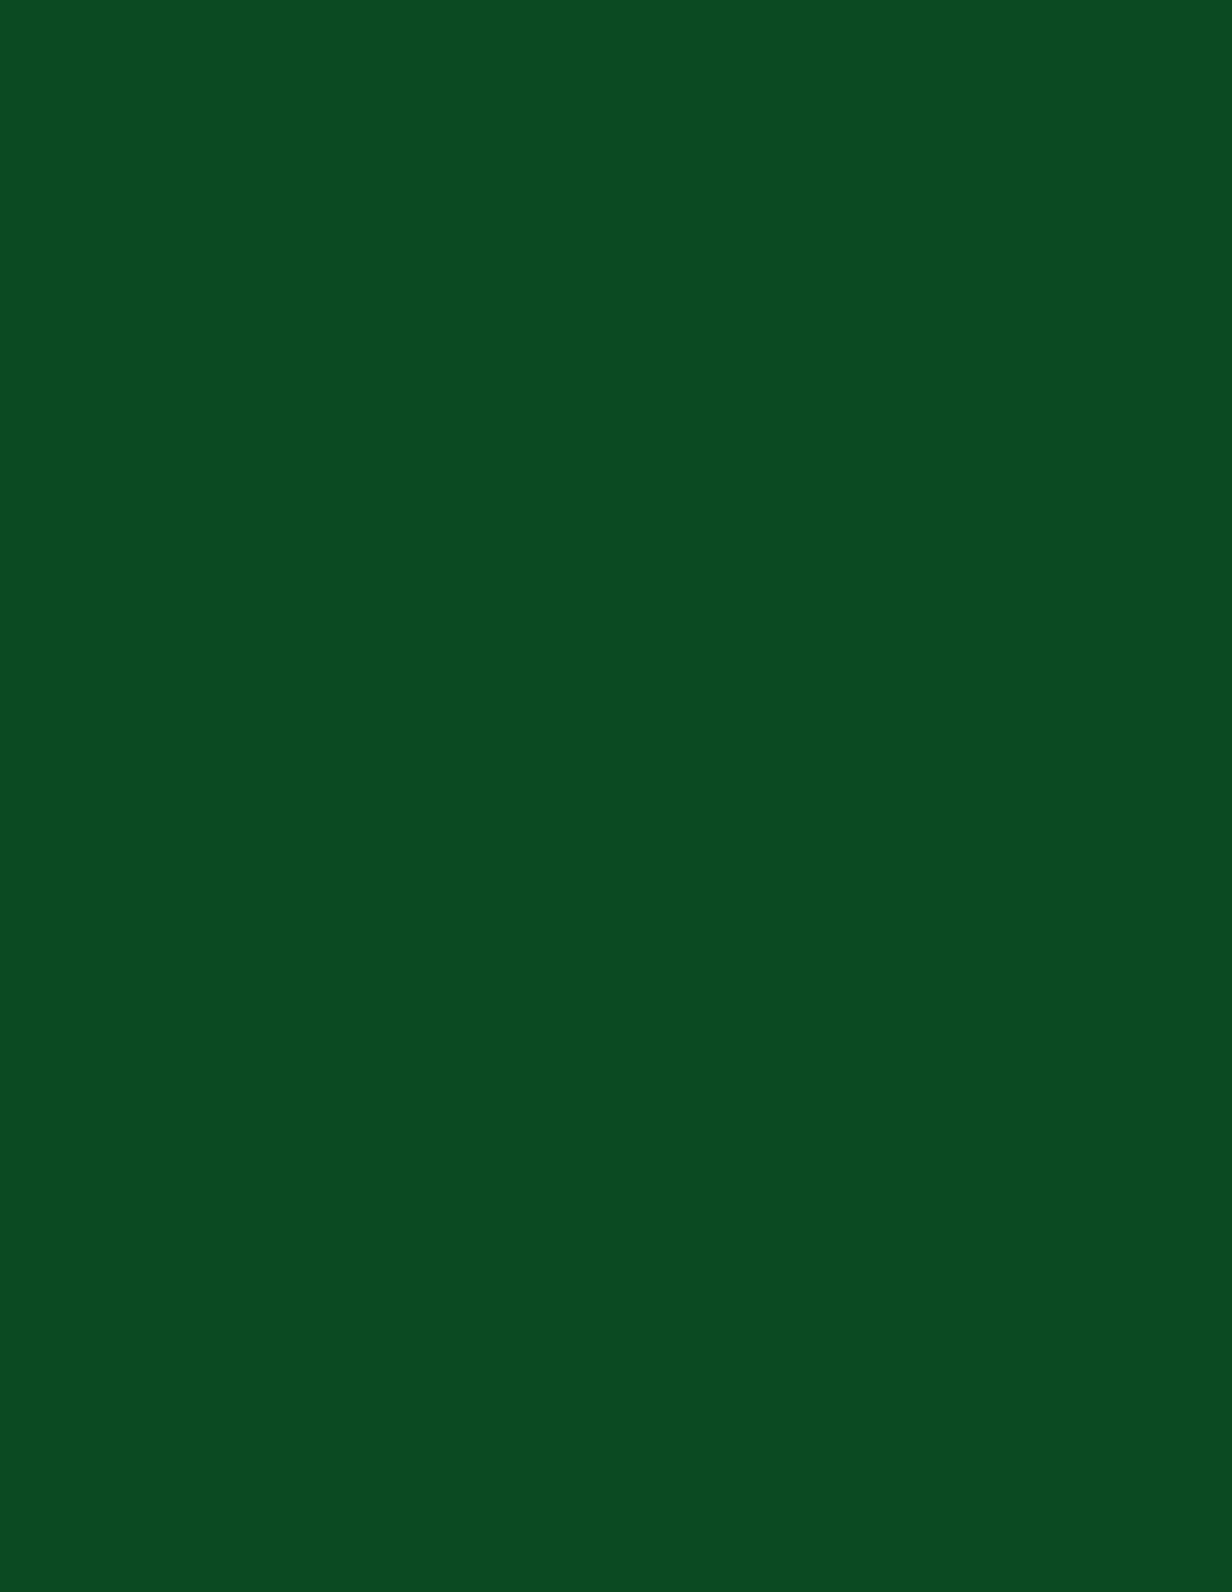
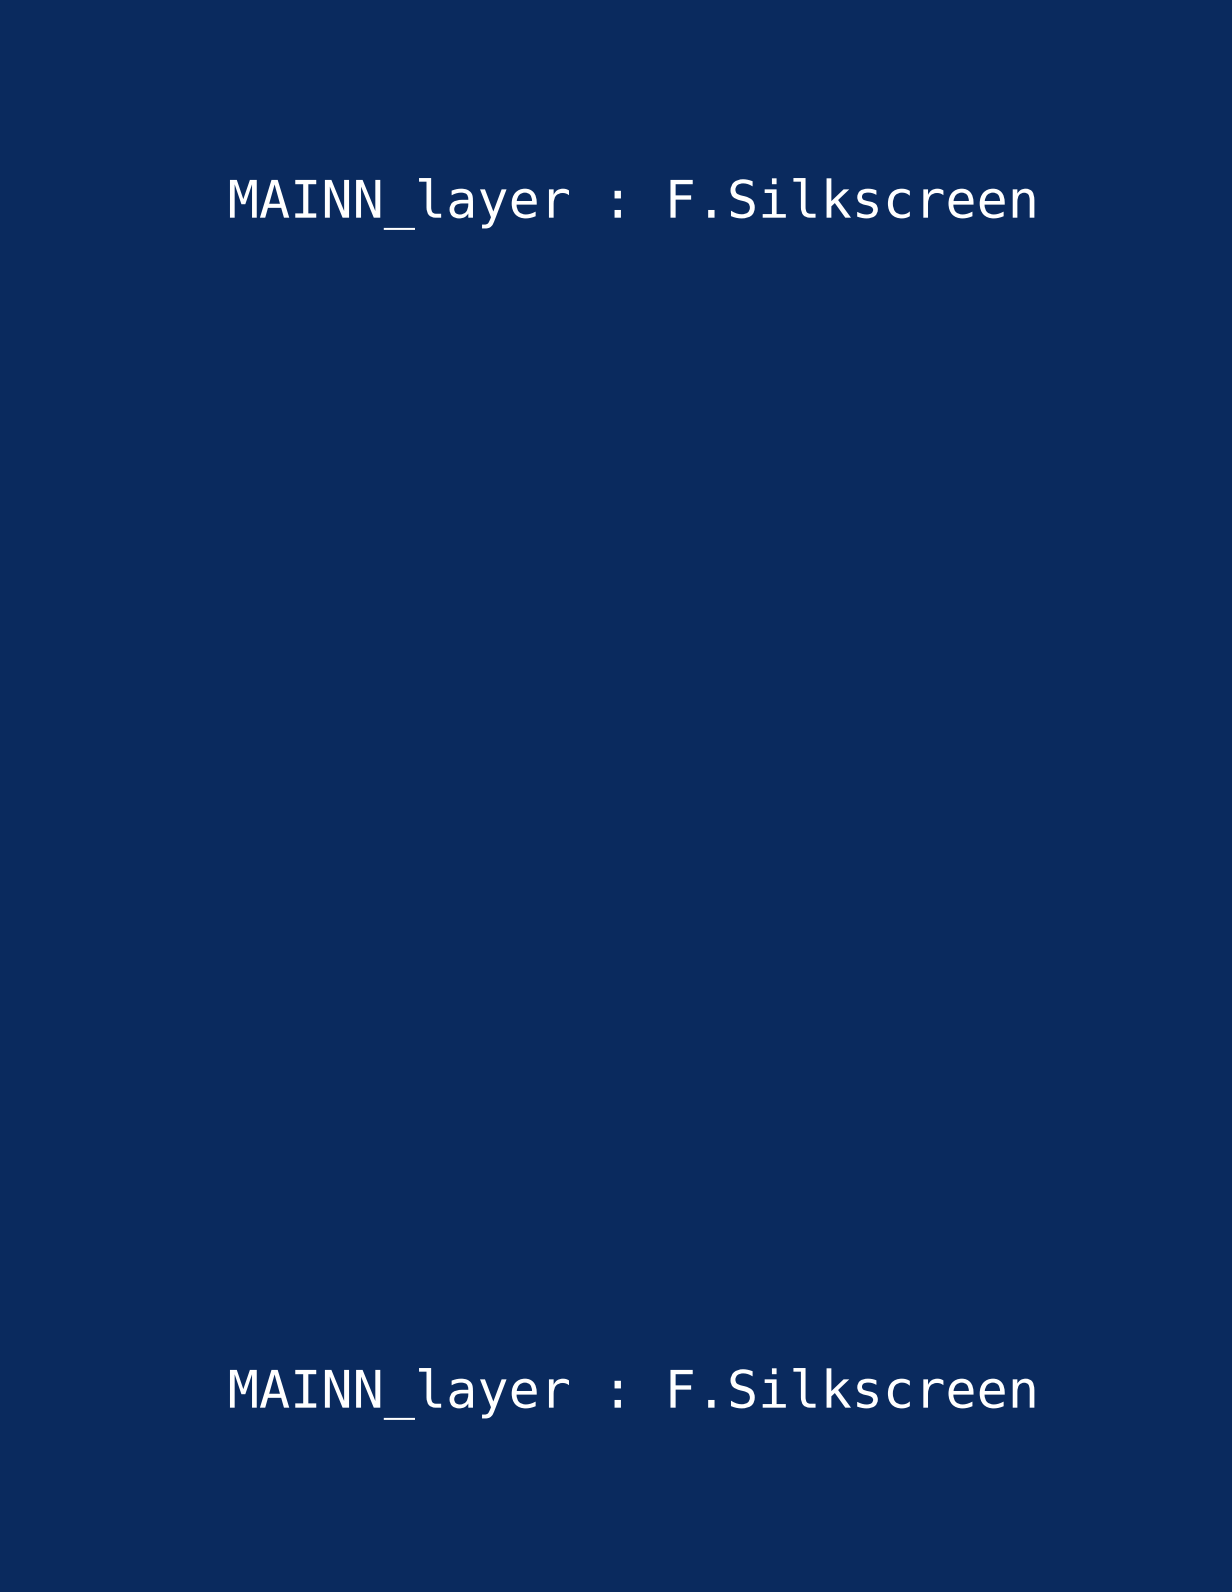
text: none -> MAINN_layer : F.Silkscreen (632, 203)
text: none -> MAINN_layer : F.Silkscreen (632, 1393)

